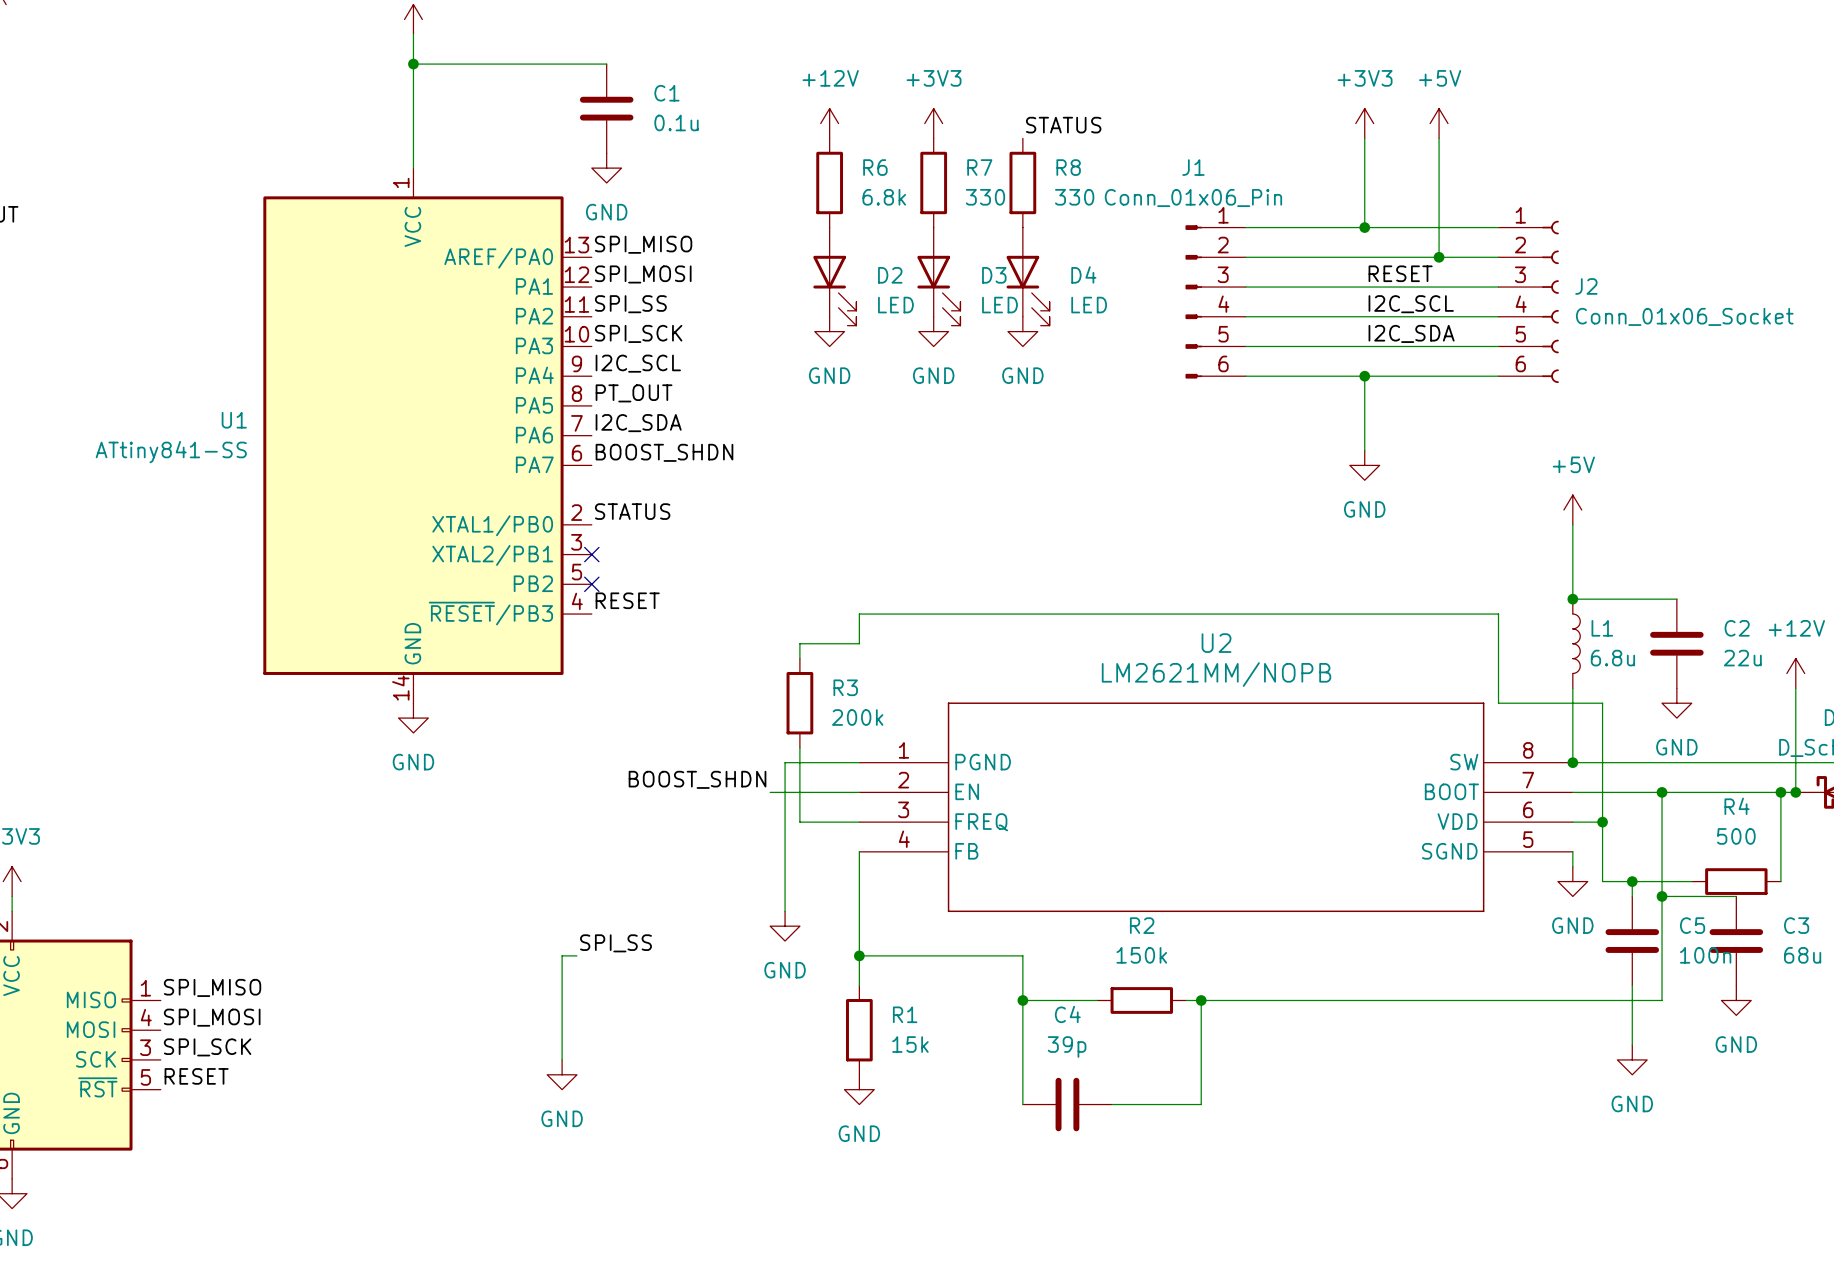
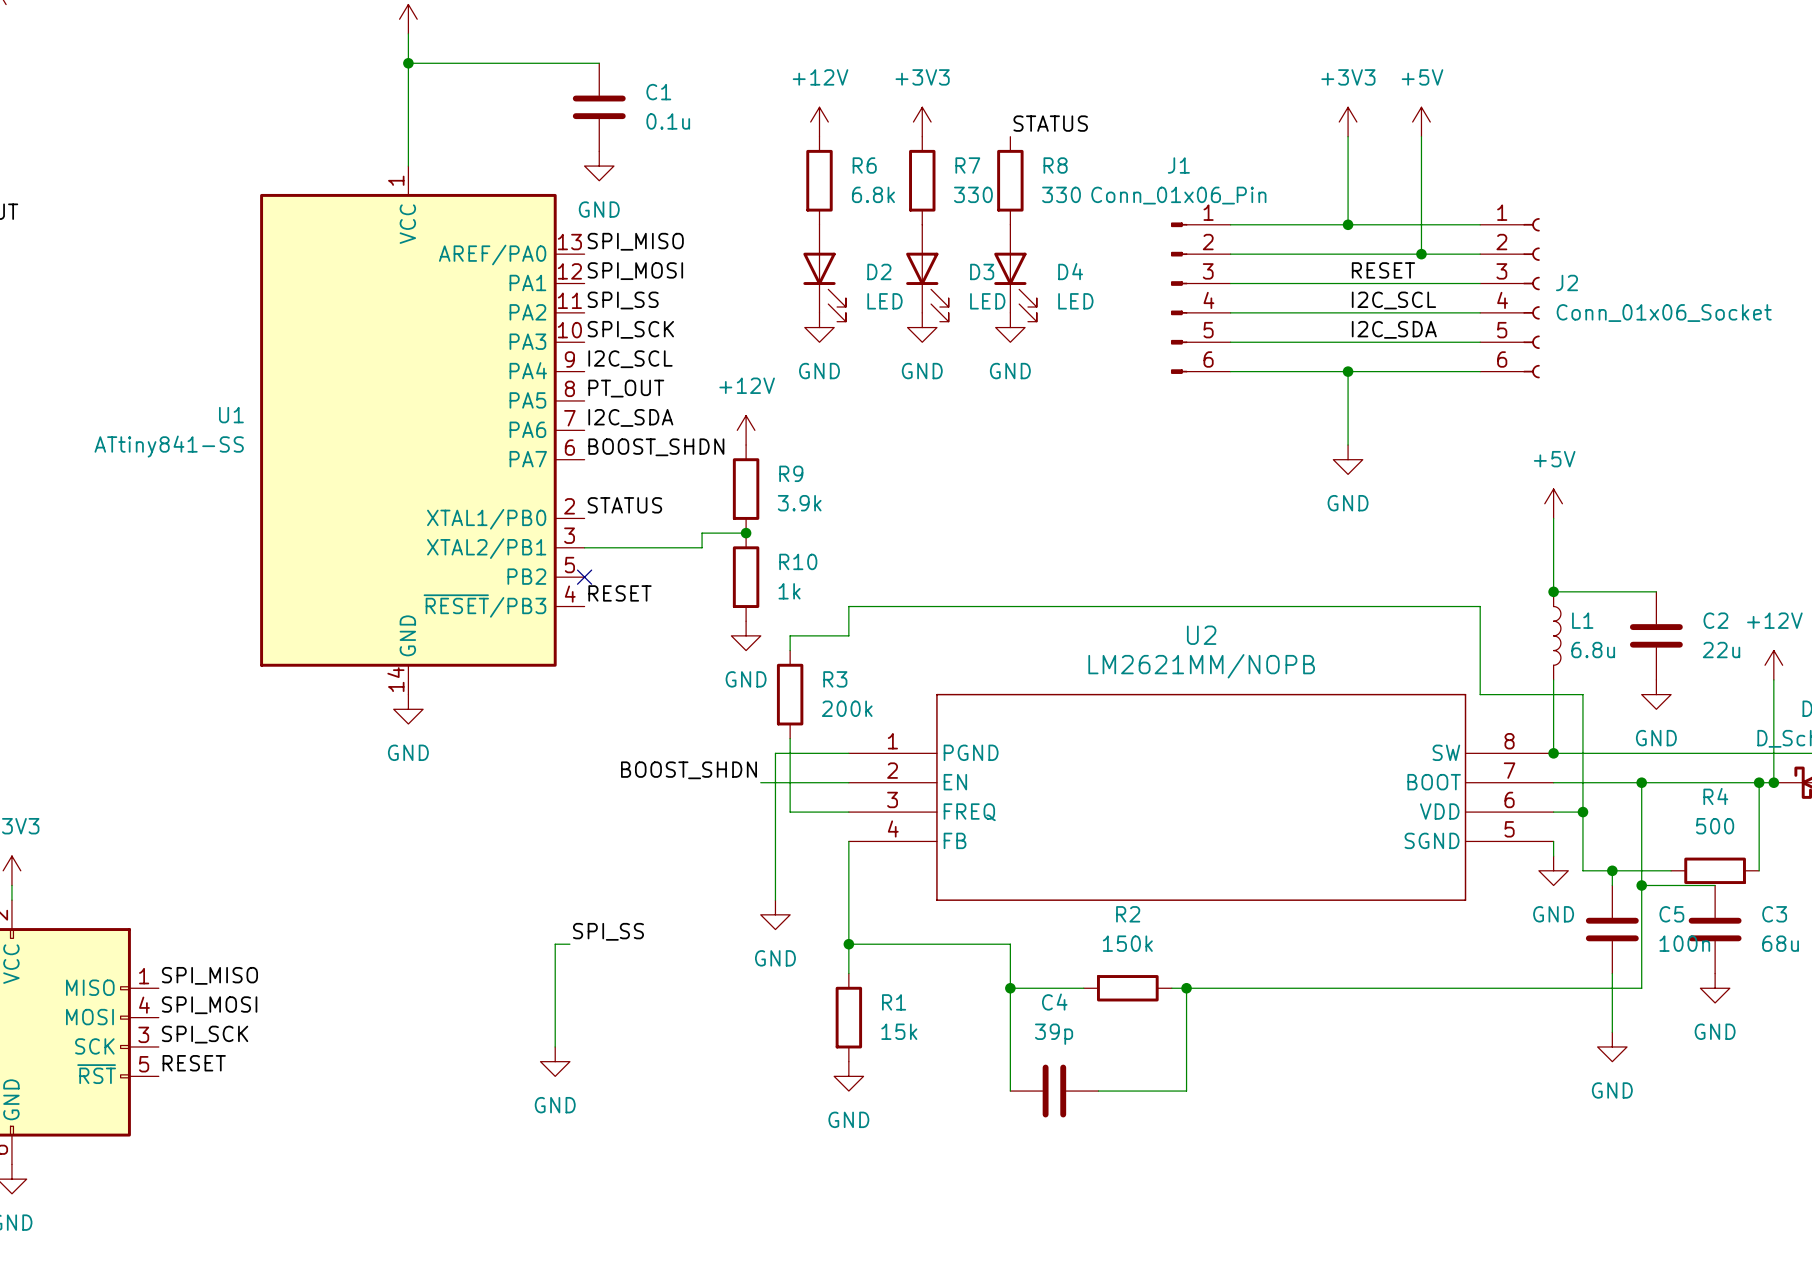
power symbol: none -> +12V (746, 430)
R9: none -> 3.9k (746, 489)
wire: none -> (746, 533) (702, 533) (702, 547) (584, 547)
junction: none -> (746, 533)
no-connect mark: (591, 554) -> none
R10: none -> 1k (746, 577)
power symbol: none -> GND (746, 635)

